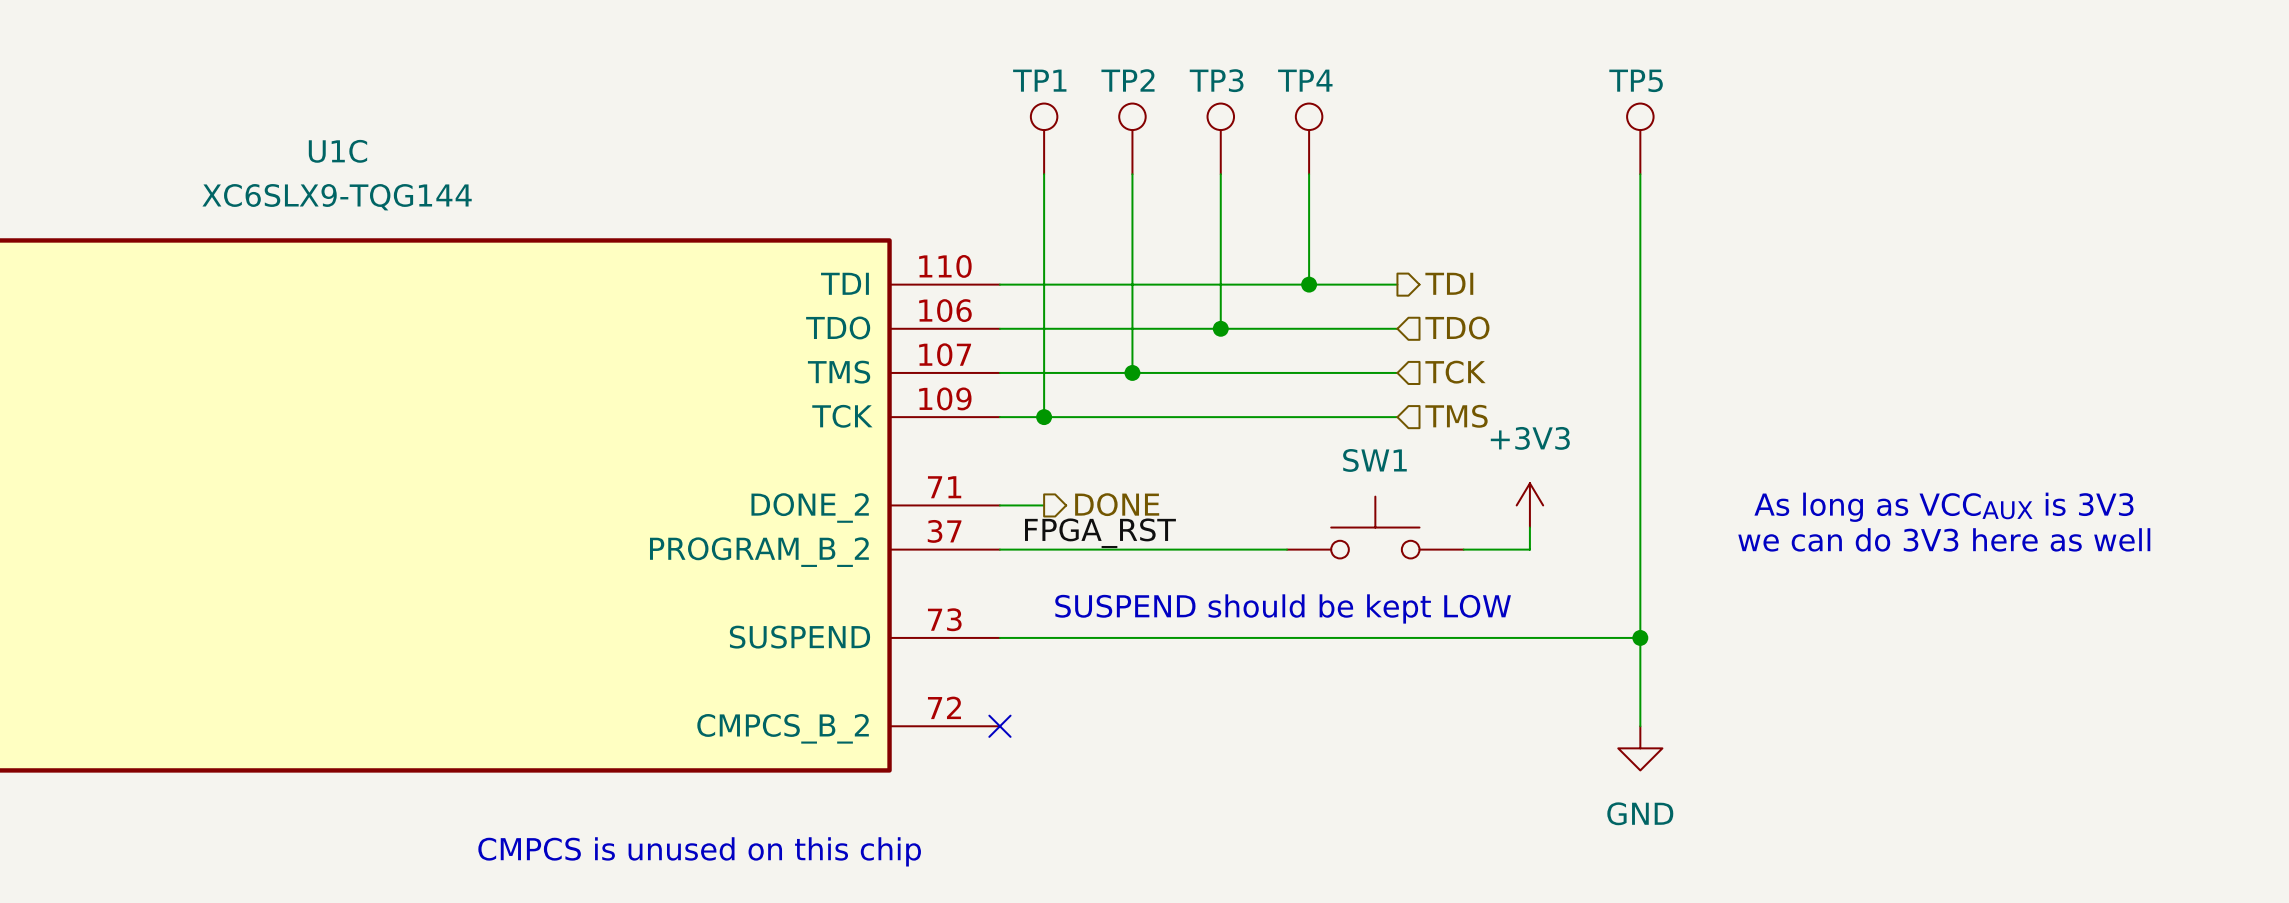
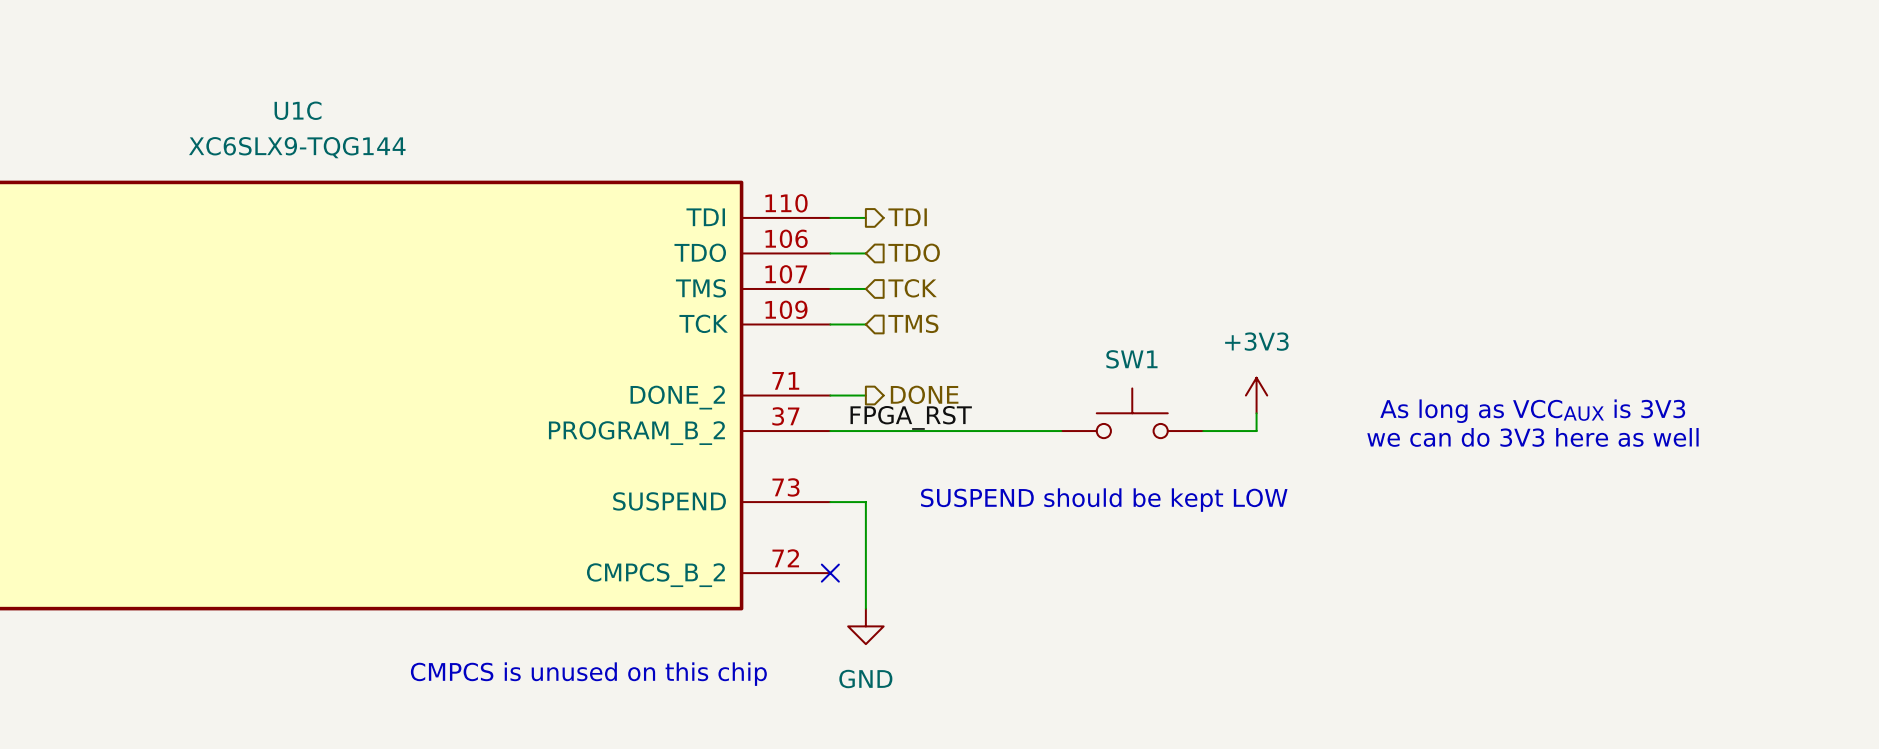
TP1: (1044, 138) -> none
TP2: (1132, 138) -> none
TP3: (1220, 138) -> none
TP4: (1309, 138) -> none
TP5: (1640, 138) -> none
wire: (1044, 174) (1044, 417) (1397, 417) -> none
wire: (1132, 174) (1132, 372) -> none
wire: (1220, 174) (1220, 328) -> none
wire: (1309, 174) (1309, 284) -> none
wire: (1640, 174) (1640, 726) -> none
hierarchical label position: TDI (1449, 283) -> TDI (907, 217)
wire: (1044, 284) (1397, 284) -> none
junction: (1309, 284) -> none
hierarchical label position: TDO (1457, 327) -> TDO (914, 252)
wire: (1044, 328) (1397, 328) -> none
junction: (1220, 328) -> none
wire: (1044, 372) (1397, 372) -> none
junction: (1132, 372) -> none
hierarchical label position: TCK (1455, 372) -> TCK (912, 288)
hierarchical label position: TMS (1456, 416) -> TMS (913, 323)
junction: (1044, 417) -> none
text position: As long as VCCAUX is 3V3 (1943, 507) -> As long as VCCAUX is 3V3 (1532, 411)
text position: we can do 3V3 here as well (1944, 539) -> we can do 3V3 here as well (1532, 437)
text position: SUSPEND should be kept LOW (1283, 608) -> SUSPEND should be kept LOW (1104, 500)
wire: (1044, 637) (1640, 637) -> (865, 502) (865, 608)
junction: (1640, 637) -> none
power symbol: GND (1640, 748) -> none
power symbol: none -> GND (865, 626)

